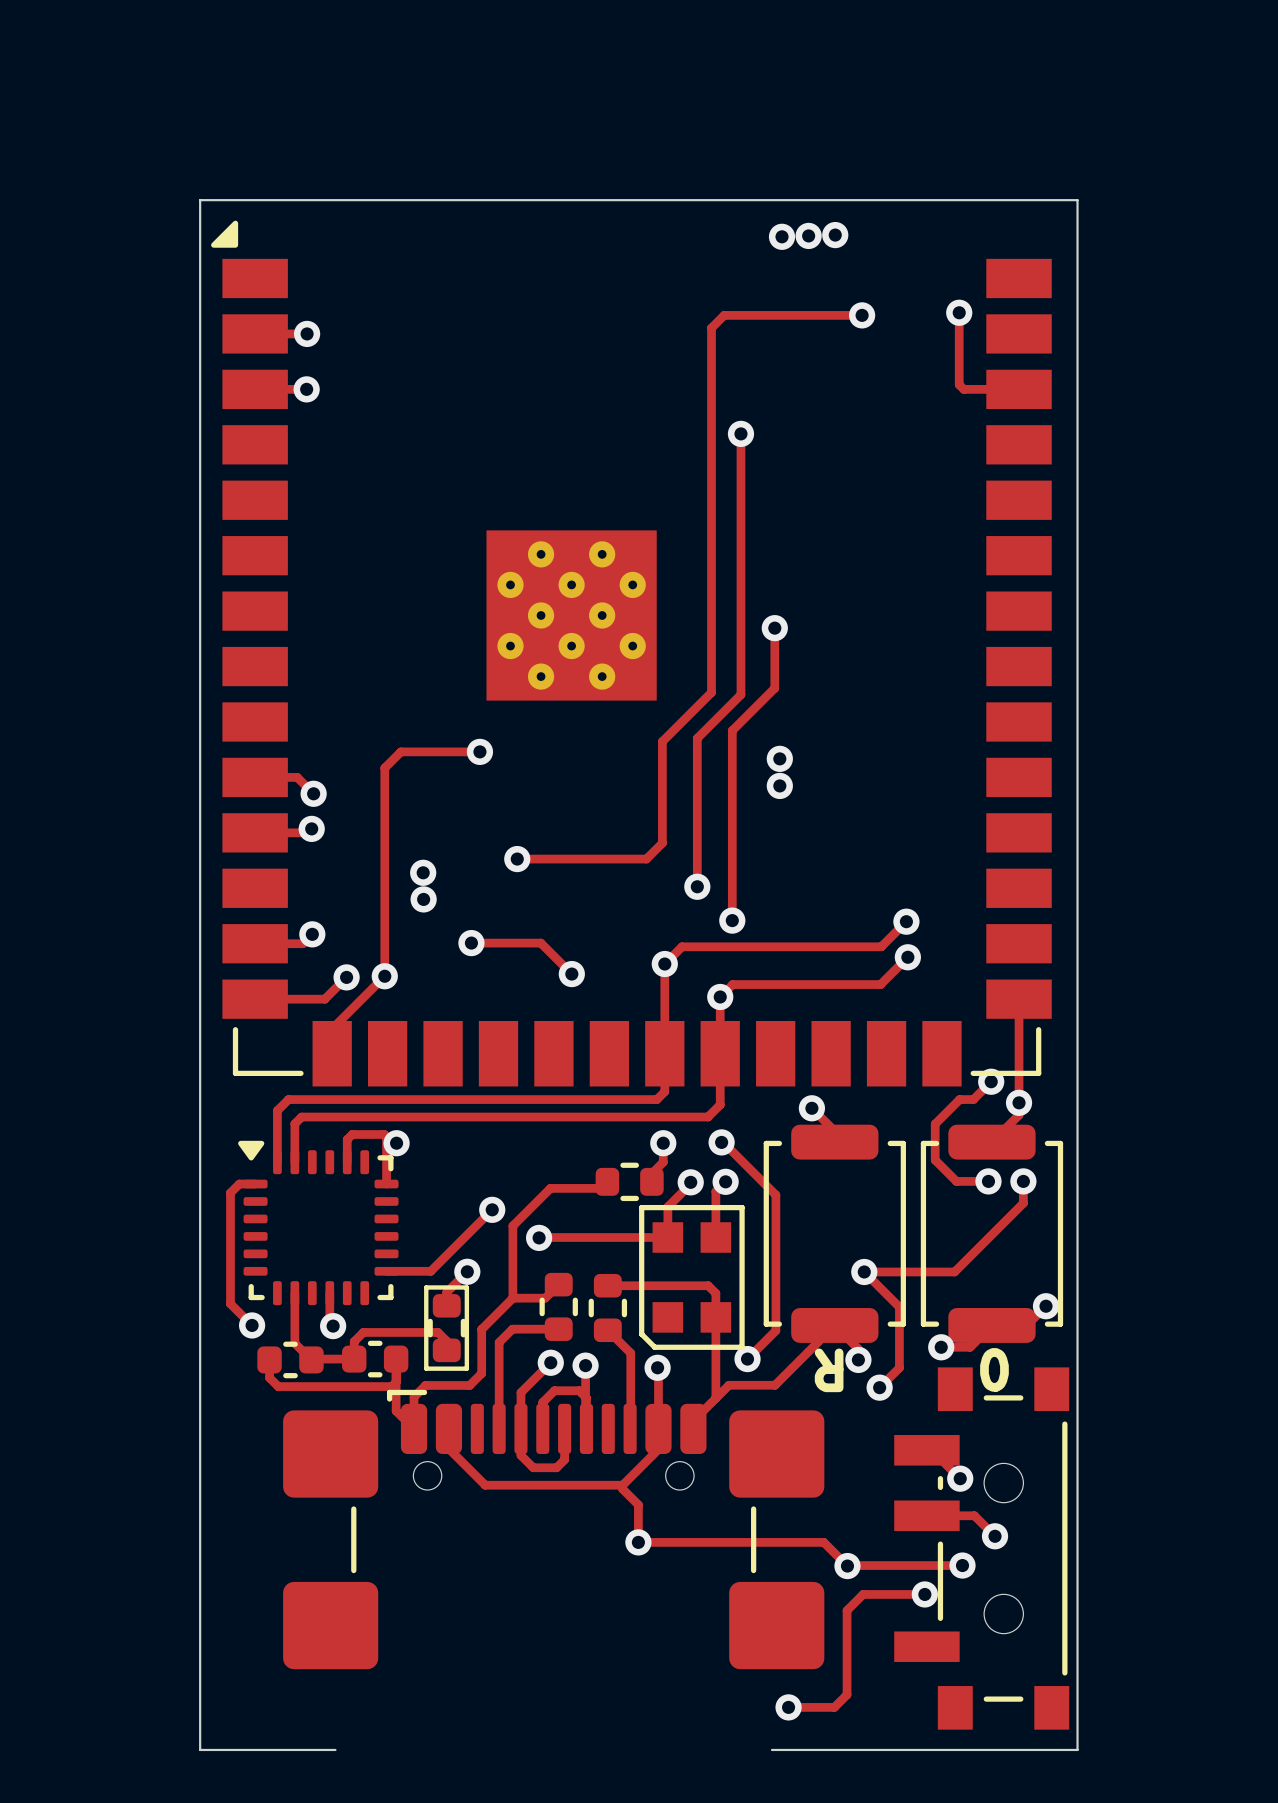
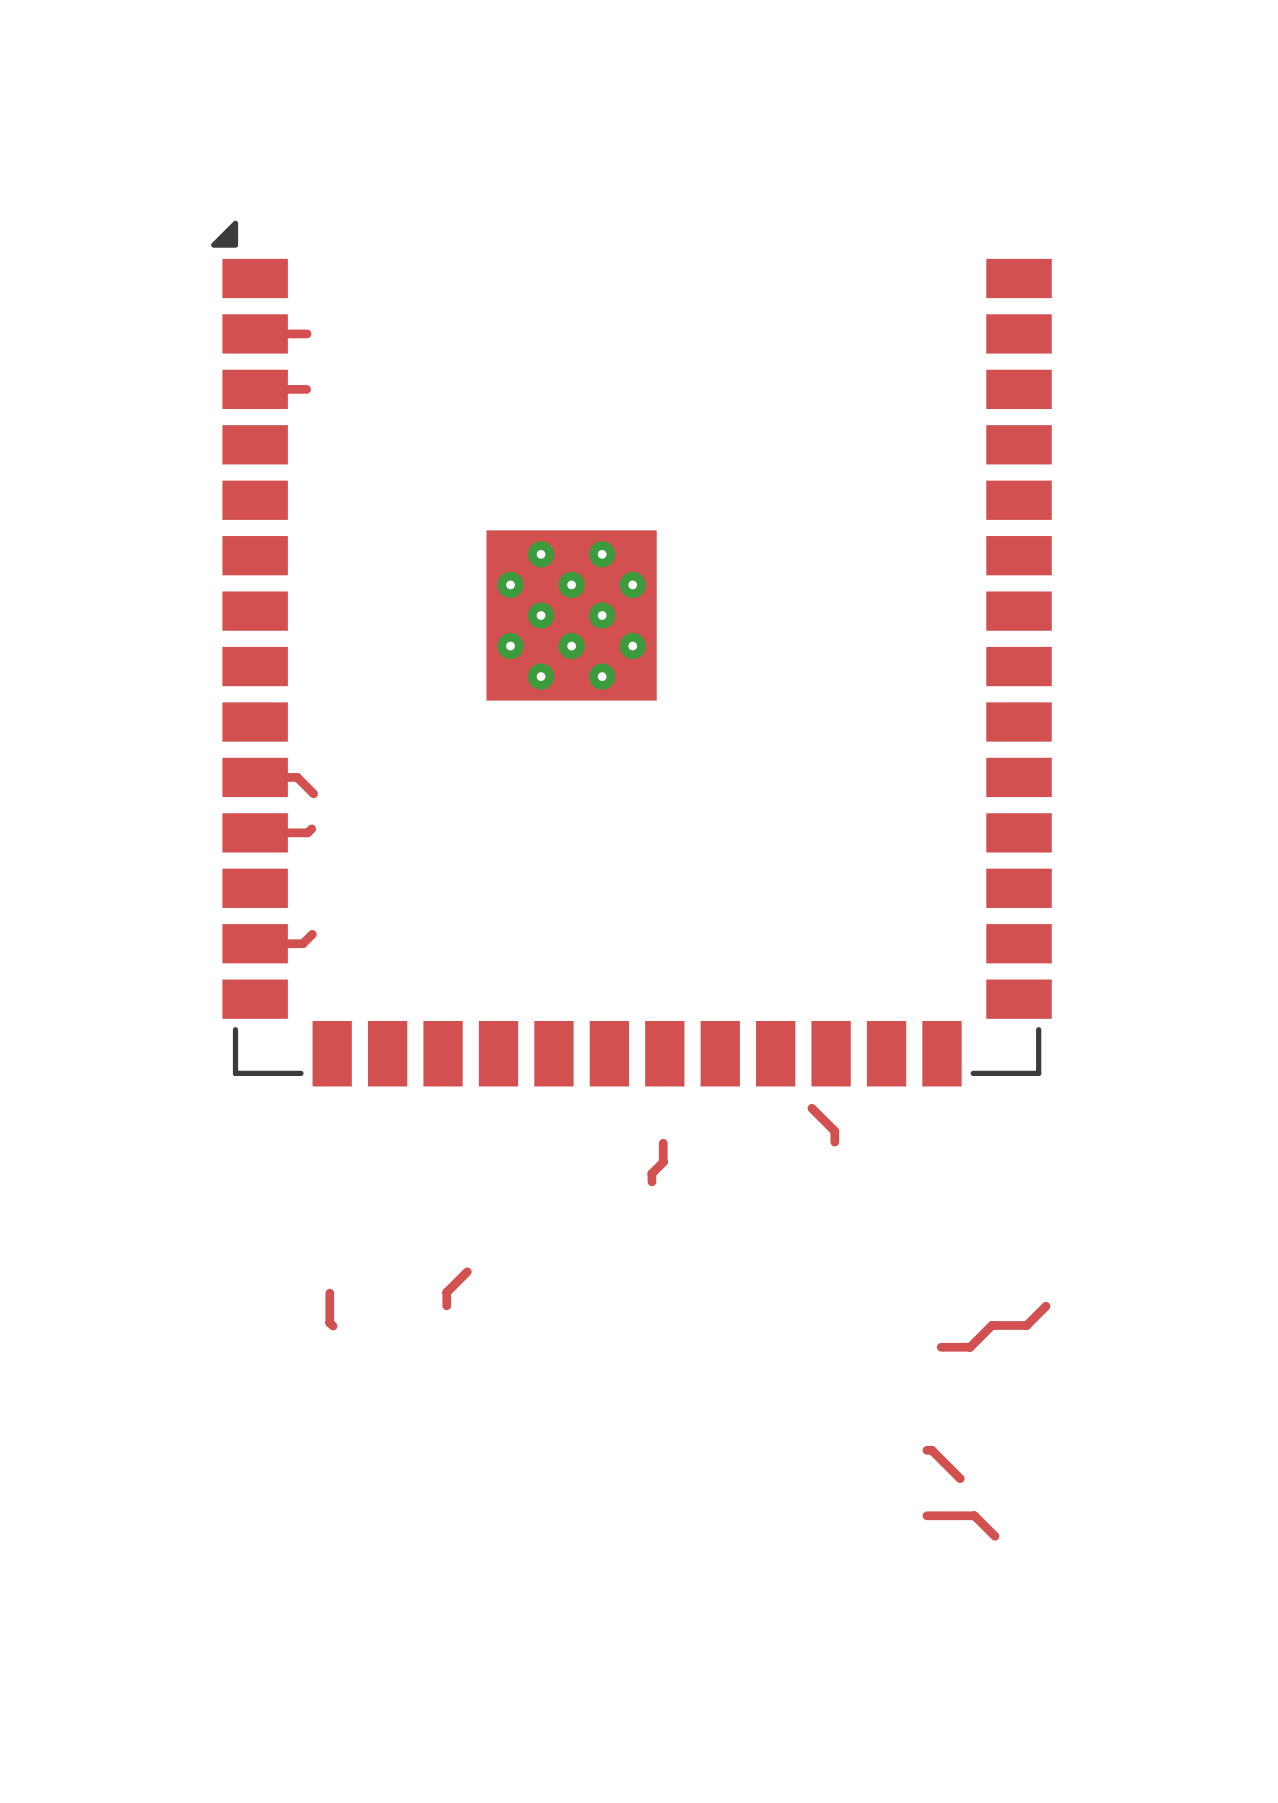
via: (808, 235) -> none
via: (835, 235) -> none
via: (782, 236) -> none
track: (959, 312) (959, 384) (963, 389) (1019, 389) -> none
via: (959, 312) -> none
track: (862, 315) (724, 315) (711, 328) (711, 692) (662, 741) (662, 843) (646, 859) (517, 859) -> none
via: (862, 315) -> none
via: (307, 333) -> none
via: (306, 389) -> none
track: (740, 433) (740, 694) (697, 738) (697, 886) -> none
via: (740, 433) -> none
track: (774, 628) (774, 688) (732, 730) (732, 920) -> none
via: (774, 628) -> none
track: (479, 751) (400, 751) (384, 768) (384, 976) (332, 1028) (332, 1053) -> none
via: (479, 751) -> none
via: (779, 758) -> none
via: (779, 785) -> none
via: (313, 793) -> none
via: (311, 828) -> none
via: (517, 859) -> none
via: (423, 872) -> none
via: (697, 886) -> none
via: (423, 899) -> none
via: (732, 920) -> none
track: (906, 921) (881, 946) (682, 946) (664, 964) (664, 1091) (656, 1099) (288, 1099) (277, 1110) (277, 1162) -> none
via: (906, 921) -> none
via: (312, 934) -> none
track: (471, 943) (540, 943) (571, 974) -> none
via: (471, 943) -> none
track: (907, 957) (880, 984) (732, 984) (720, 996) (720, 1104) (708, 1117) (301, 1117) (294, 1123) (294, 1162) -> none
via: (907, 957) -> none
via: (664, 964) -> none
via: (571, 974) -> none
via: (384, 976) -> none
track: (346, 977) (324, 999) (255, 999) -> none
via: (346, 977) -> none
via: (720, 996) -> none
track: (1019, 999) (1019, 1115) (991, 1142) -> none
track: (991, 1081) (973, 1099) (959, 1099) (935, 1124) (935, 1160) (956, 1181) (988, 1181) -> none
via: (991, 1081) -> none
via: (1019, 1102) -> none
via: (811, 1108) -> none
track: (386, 1136) (386, 1184) -> none
track: (721, 1142) (775, 1195) (775, 1330) (747, 1359) -> none
via: (721, 1142) -> none
track: (396, 1143) (392, 1143) (384, 1134) (352, 1134) (347, 1139) (347, 1162) -> none
via: (396, 1143) -> none
via: (663, 1143) -> none
track: (607, 1181) (600, 1188) (550, 1188) (512, 1225) (512, 1298) -> none
part: (629, 1181) -> none
track: (725, 1181) (715, 1191) (715, 1237) -> none
via: (725, 1181) -> none
via: (988, 1181) -> none
track: (1023, 1181) (1023, 1203) (954, 1271) (864, 1271) (899, 1307) (899, 1367) (879, 1387) -> none
via: (1023, 1181) -> none
track: (690, 1182) (667, 1206) (667, 1237) (539, 1237) -> none
via: (690, 1182) -> none
track: (255, 1184) (239, 1184) (230, 1192) (230, 1303) (252, 1325) -> none
track: (492, 1209) (430, 1271) (386, 1271) -> none
via: (492, 1209) -> none
part: (318, 1222) -> none
part: (834, 1233) -> none
part: (991, 1233) -> none
via: (539, 1237) -> none
via: (467, 1271) -> none
via: (864, 1271) -> none
part: (691, 1277) -> none
track: (558, 1284) (545, 1298) (512, 1298) -> none
track: (607, 1285) (708, 1285) (715, 1293) (715, 1398) -> none
line: (426, 1287) (466, 1287) (466, 1368) (426, 1368) (426, 1287) -> none
track: (294, 1293) (294, 1343) (311, 1359) (354, 1359) (354, 1341) (363, 1332) (438, 1332) (446, 1341) (446, 1350) -> none
track: (512, 1298) (481, 1329) (481, 1373) (469, 1385) (425, 1385) (414, 1397) (414, 1428) (396, 1411) (396, 1359) -> none
part: (558, 1306) -> none
via: (1046, 1306) -> none
part: (607, 1308) -> none
via: (252, 1325) -> none
via: (333, 1326) -> none
part: (446, 1328) -> none
track: (558, 1329) (512, 1329) (499, 1342) (499, 1420) -> none
track: (607, 1330) (630, 1353) (630, 1420) -> none
via: (941, 1347) -> none
track: (269, 1359) (269, 1377) (278, 1386) (391, 1386) (396, 1382) -> none
part: (290, 1359) -> none
part: (375, 1359) -> none
via: (747, 1359) -> none
track: (858, 1359) (858, 1349) (834, 1325) (775, 1385) (728, 1385) (694, 1420) -> none
via: (858, 1359) -> none
track: (550, 1362) (520, 1392) (520, 1455) (533, 1467) (556, 1467) (564, 1459) (564, 1428) -> none
via: (550, 1362) -> none
track: (585, 1365) (585, 1428) (586, 1428) (586, 1398) (579, 1390) (554, 1390) (542, 1402) (542, 1428) (543, 1420) -> none
via: (585, 1365) -> none
track: (657, 1367) (658, 1449) (622, 1485) -> none
via: (657, 1367) -> none
text: 0 (994, 1369) -> none
text: R (829, 1370) -> none
via: (879, 1387) -> none
track: (448, 1428) (448, 1448) (485, 1485) (622, 1485) -> none
via: (960, 1478) -> none
track: (622, 1485) (622, 1489) (638, 1504) (638, 1542) (823, 1542) (847, 1566) -> none
part: (553, 1529) -> none
via: (995, 1536) -> none
via: (638, 1542) -> none
part: (981, 1548) -> none
track: (847, 1565) (962, 1565) -> none
via: (962, 1565) -> none
via: (847, 1566) -> none
track: (924, 1594) (863, 1594) (847, 1610) (847, 1694) (834, 1707) (788, 1707) -> none
via: (924, 1594) -> none
via: (788, 1707) -> none
board edge: (335, 1749) (200, 1749) (200, 200) (1077, 200) (1077, 1749) (771, 1749) -> none

